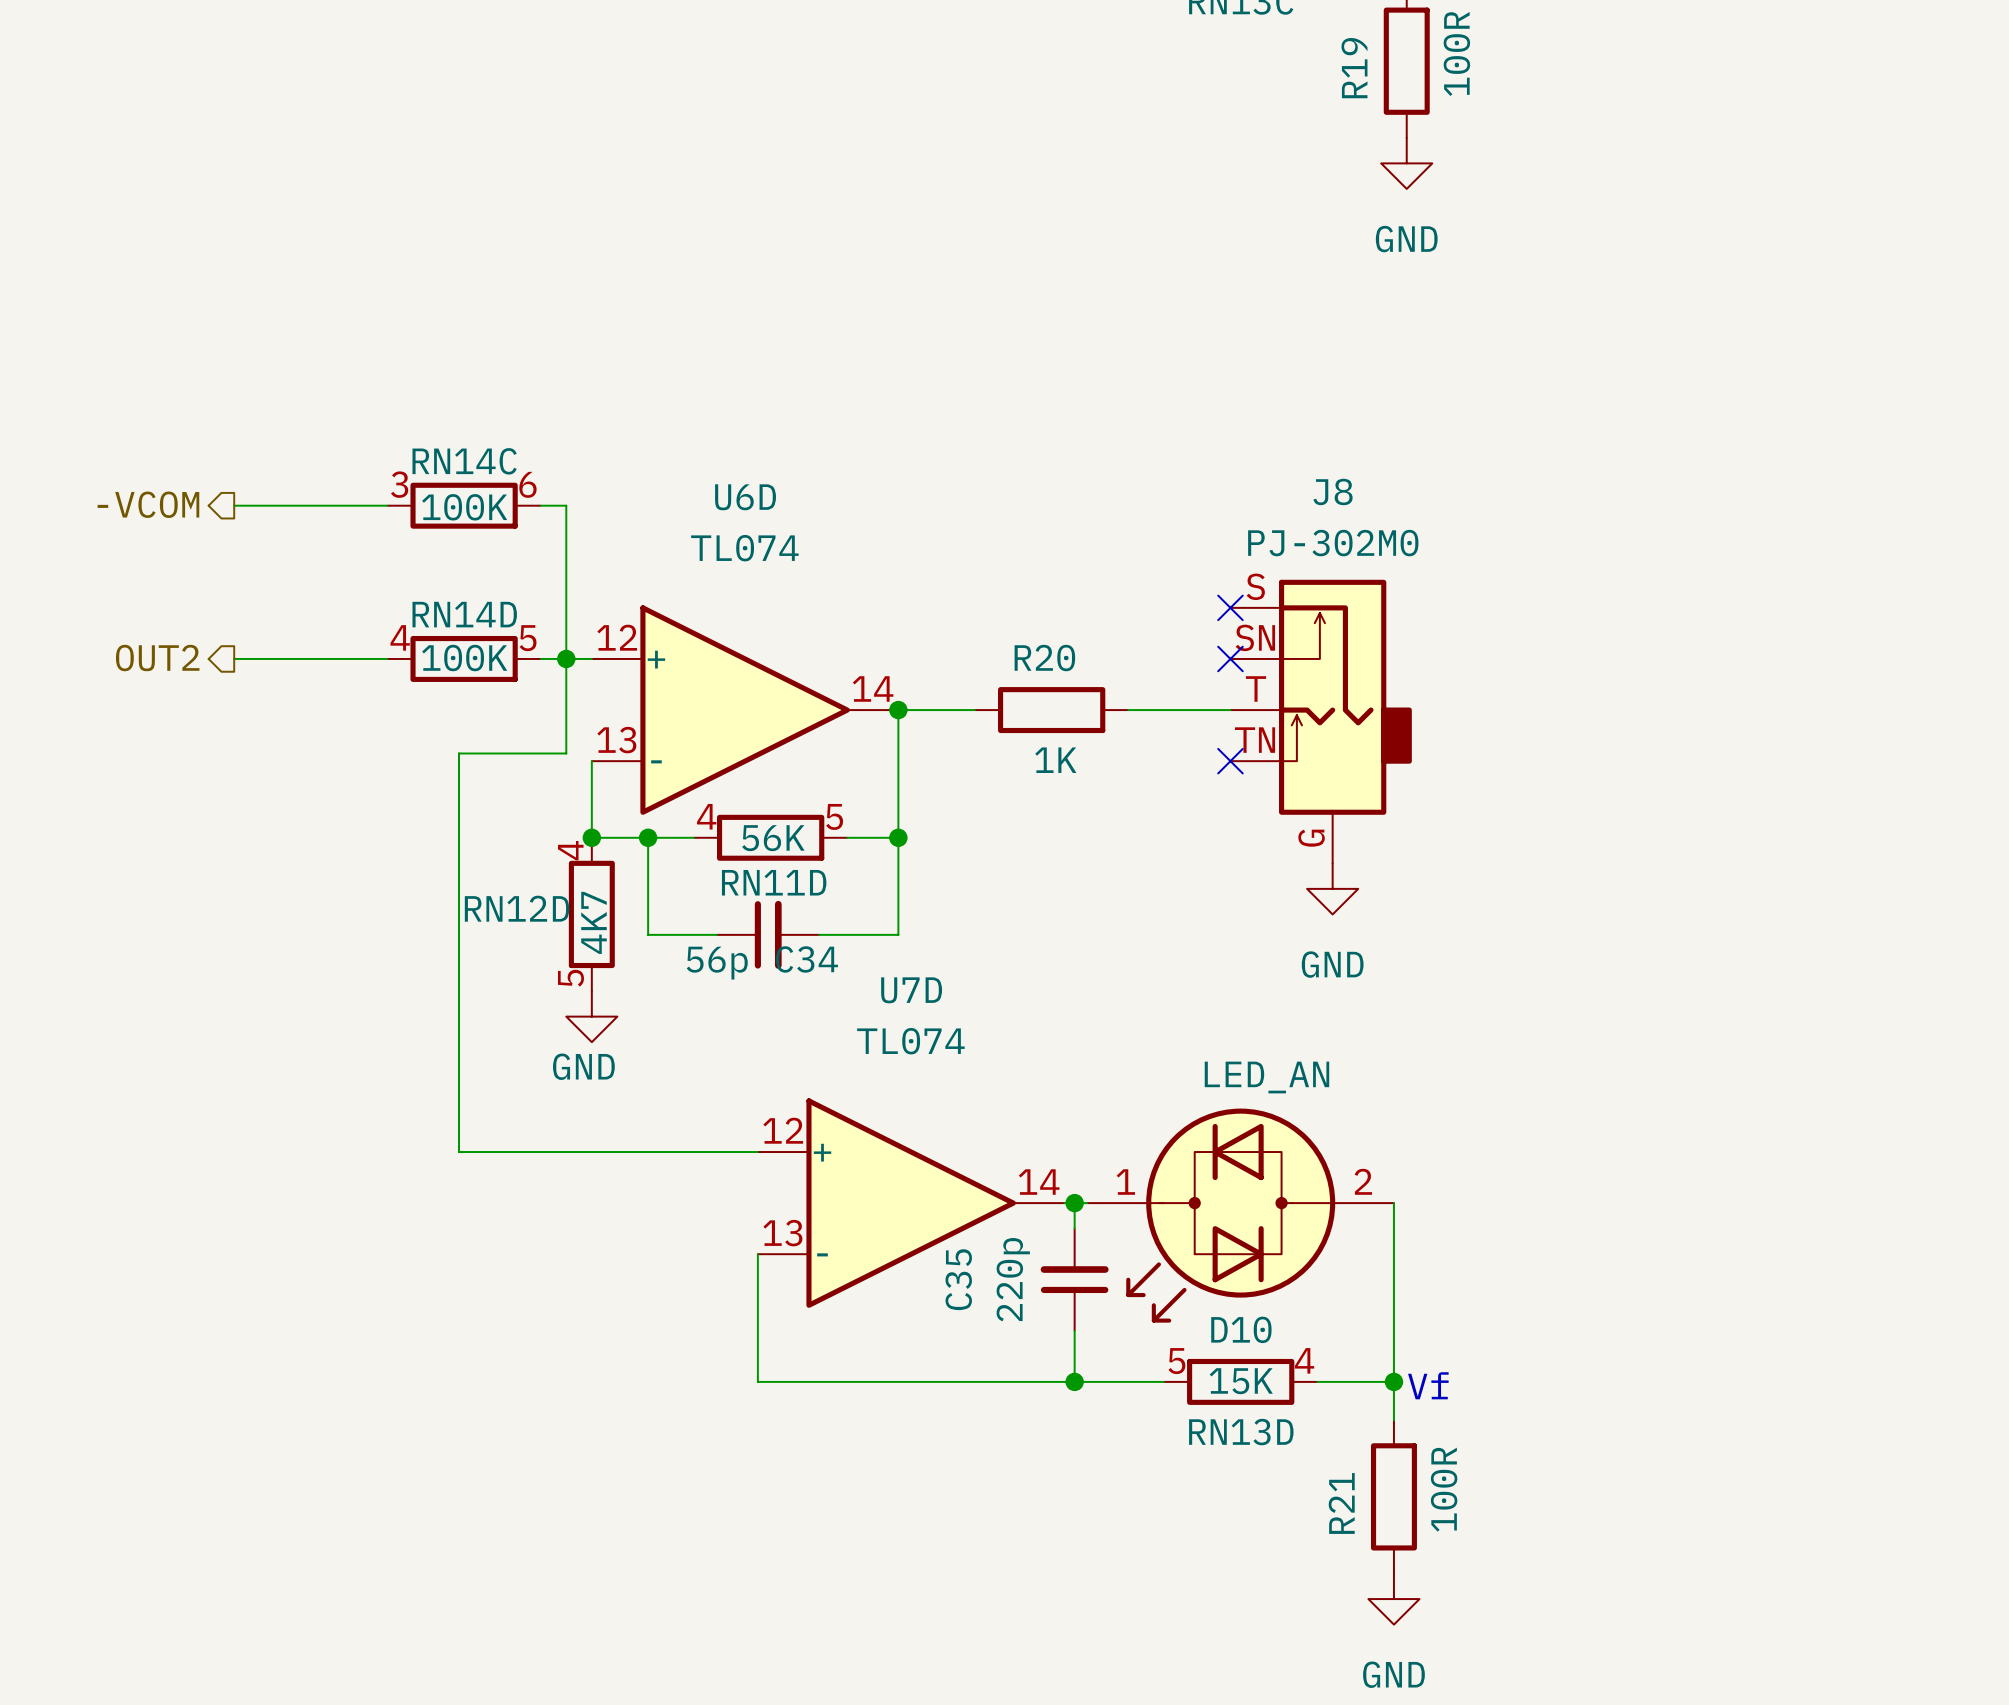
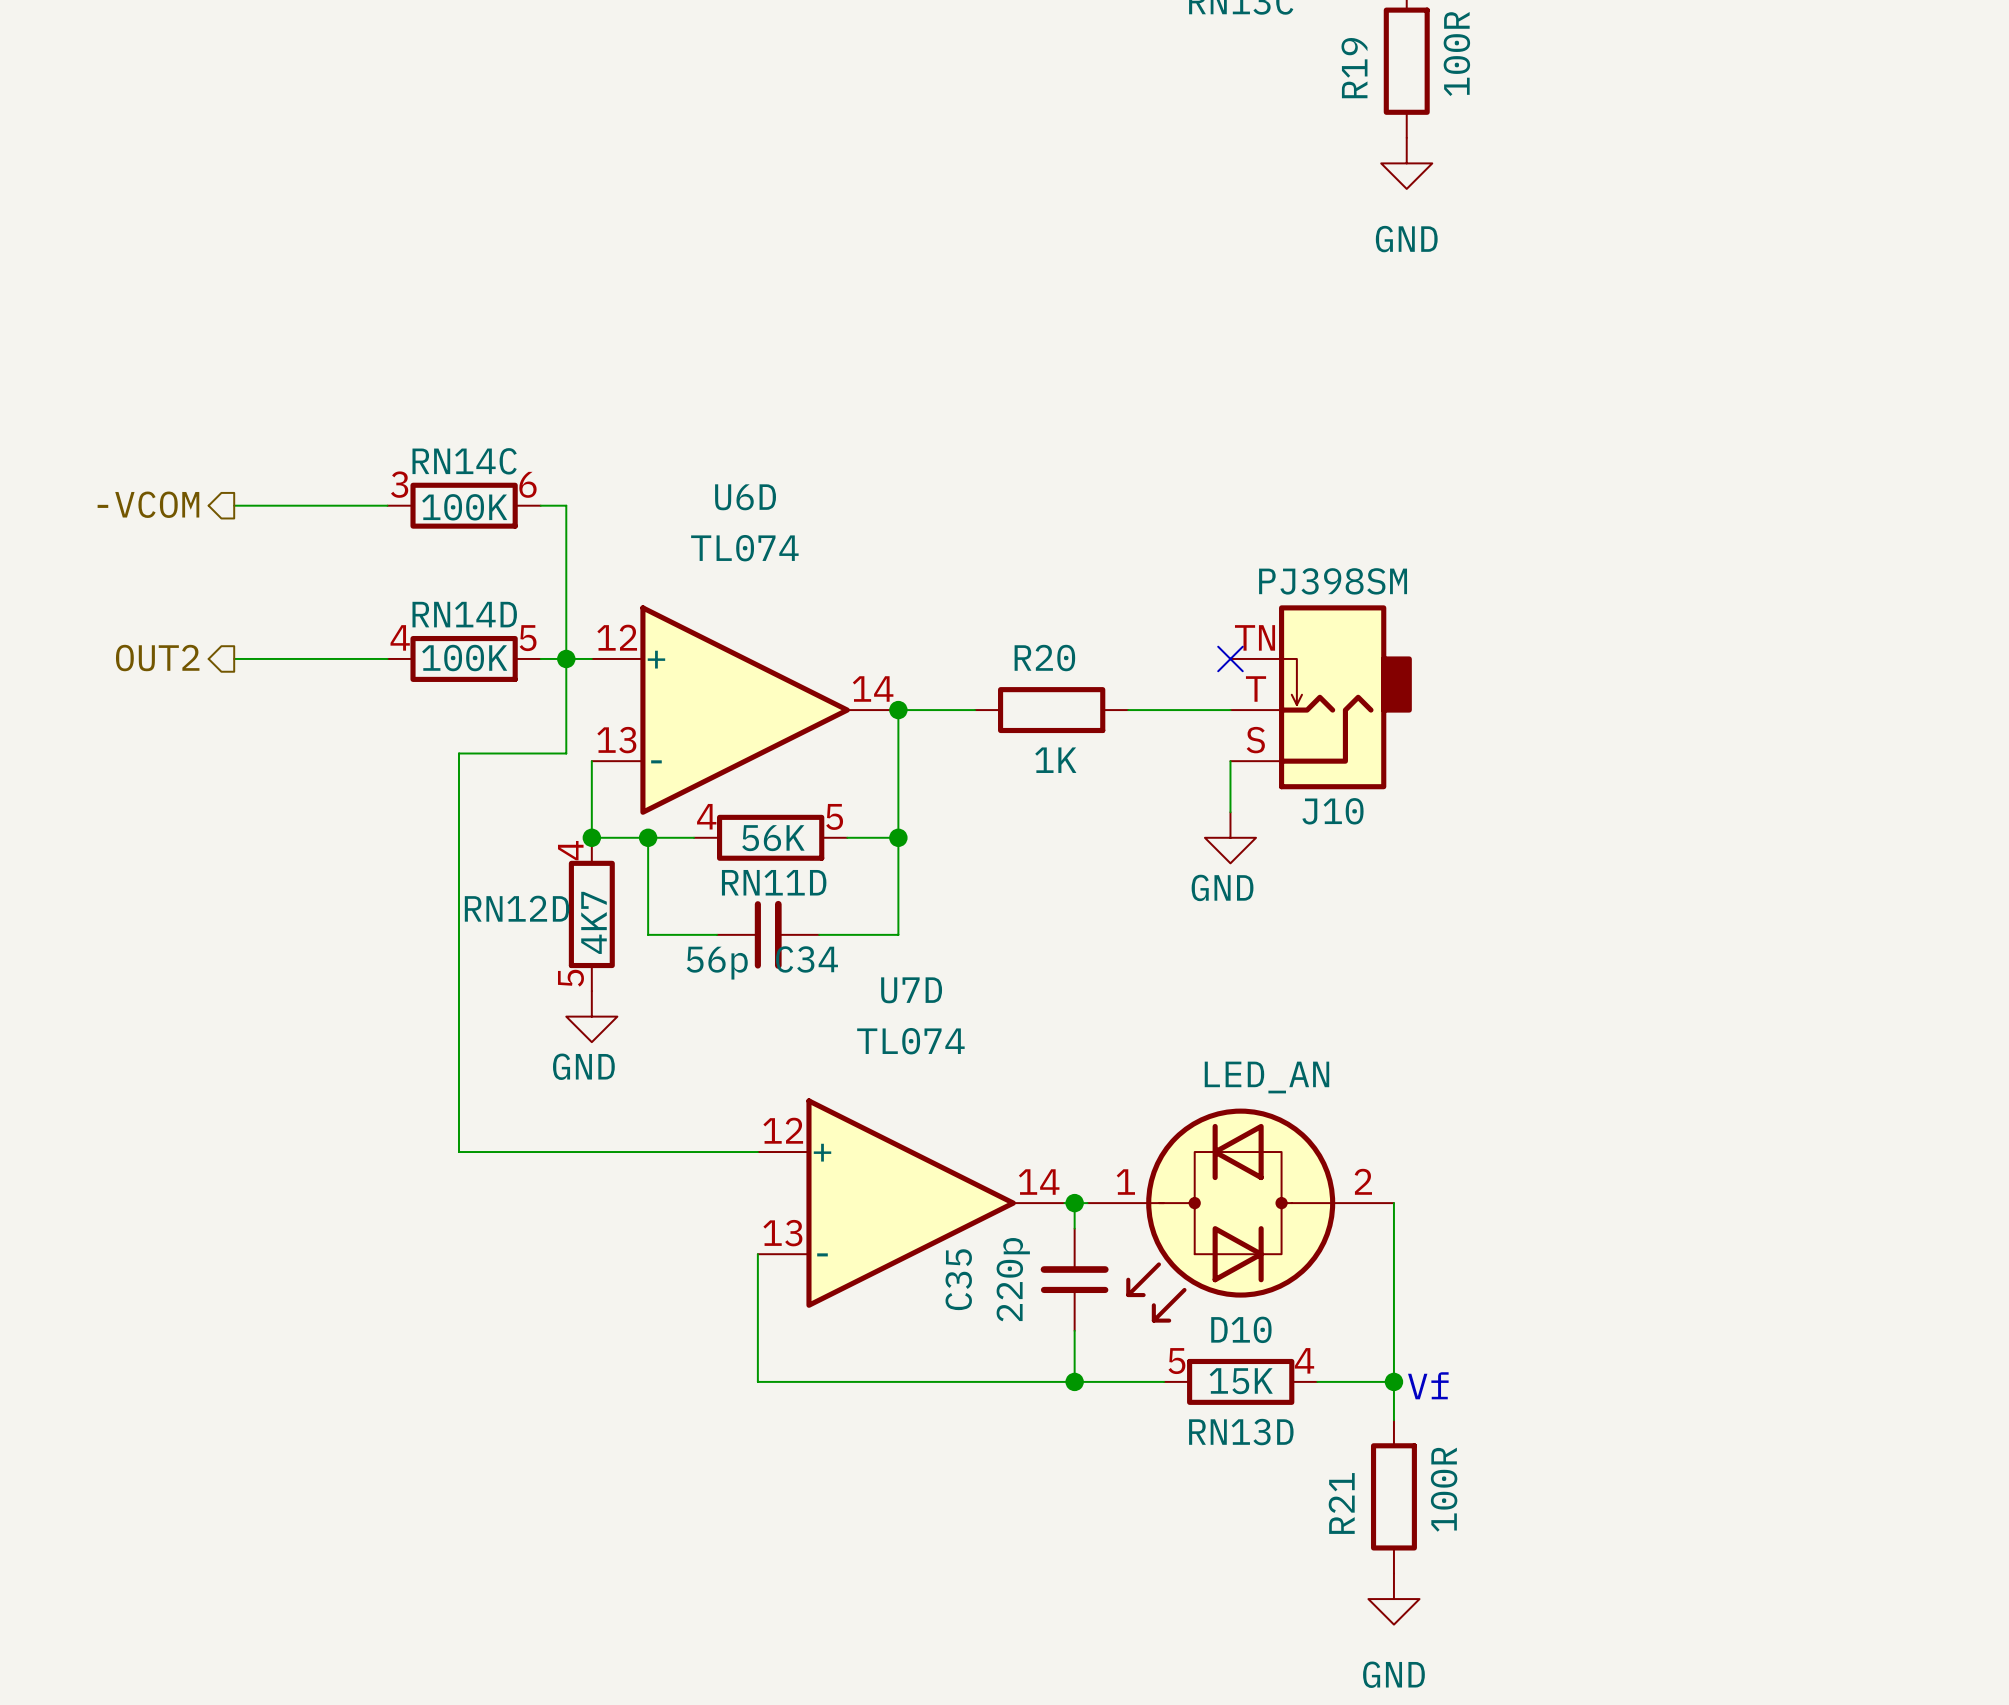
no-connect mark: (1230, 607) -> none
J10: none -> PJ398SM (1321, 697)
J8: PJ-302M0 (1321, 721) -> none
wire: none -> (1230, 761) (1230, 812)
no-connect mark: (1230, 761) -> none
power symbol position: GND (1332, 888) -> GND (1230, 837)
power symbol text position: GND (1332, 964) -> GND (1222, 887)

